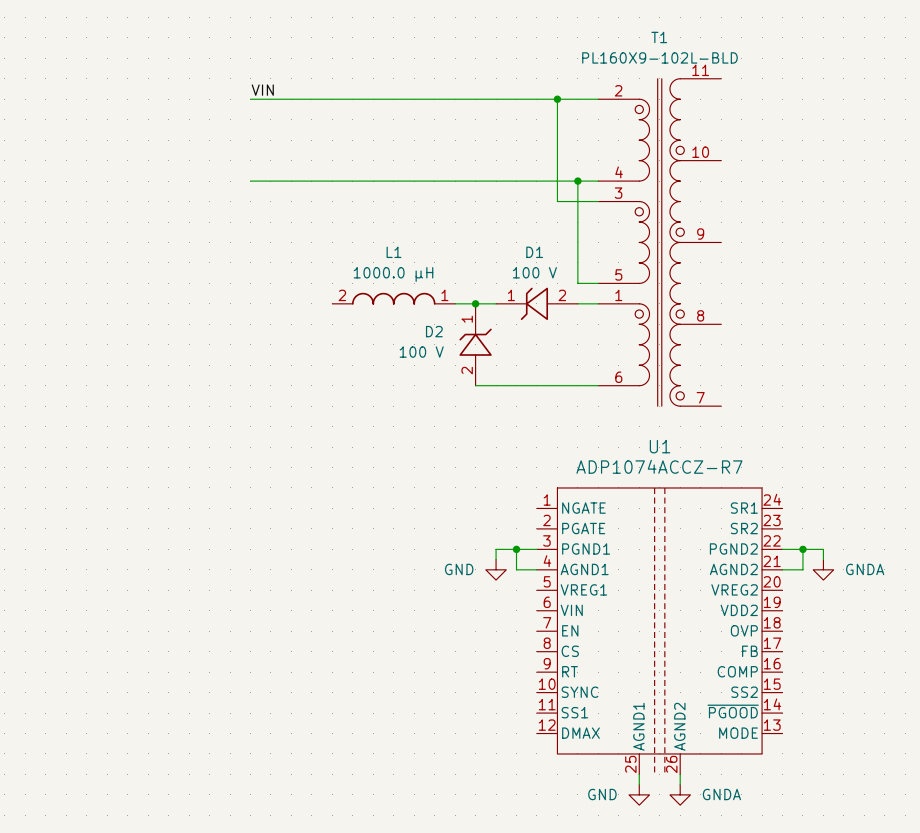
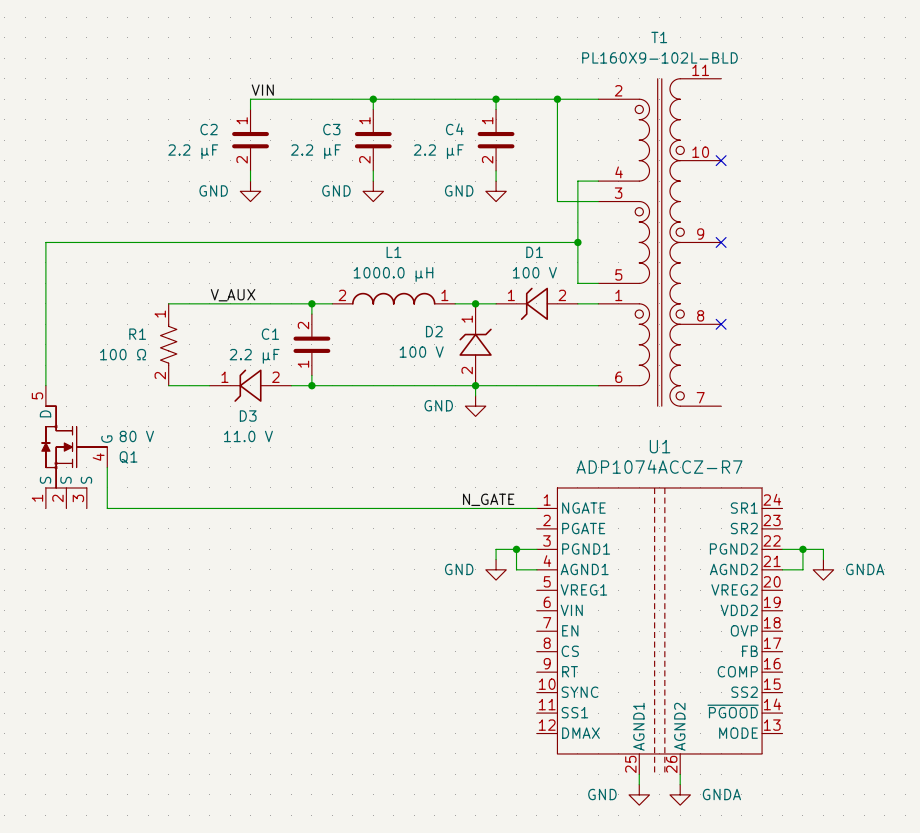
wire: none -> (250, 99) (250, 109)
wire: none -> (373, 99) (373, 109)
junction: none -> (373, 99)
wire: none -> (496, 99) (496, 109)
junction: none -> (496, 99)
C2: none -> 2.2 µF (250, 140)
C3: none -> 2.2 µF (373, 140)
C4: none -> 2.2 µF (496, 140)
no-connect mark: none -> (721, 160)
wire: none -> (373, 170) (373, 181)
wire: none -> (496, 170) (496, 181)
wire: (250, 181) (577, 181) -> (250, 181) (250, 170)
junction: (577, 181) -> none
power symbol: none -> GND (250, 191)
power symbol: none -> GND (373, 191)
power symbol: none -> GND (496, 191)
wire: none -> (577, 242) (45, 242) (45, 385)
junction: none -> (577, 242)
no-connect mark: none -> (721, 242)
label: none -> V_AUX (233, 295)
wire: none -> (168, 303) (332, 303)
wire: none -> (311, 303) (311, 314)
junction: none -> (311, 303)
no-connect mark: none -> (721, 324)
R1: none -> 100 Ω (168, 344)
C1: none -> 2.2 µF (311, 344)
wire: none -> (311, 375) (311, 385)
wire: none -> (168, 385) (209, 385)
D3: none -> 11.0 V (250, 385)
wire: none -> (291, 385) (475, 385) (475, 395)
junction: none -> (311, 385)
junction: none -> (475, 385)
power symbol: none -> GND (475, 406)
Q1: none -> 80 V (74, 447)
wire: none -> (107, 467) (107, 508) (536, 508)
label: none -> N_GATE (488, 499)

